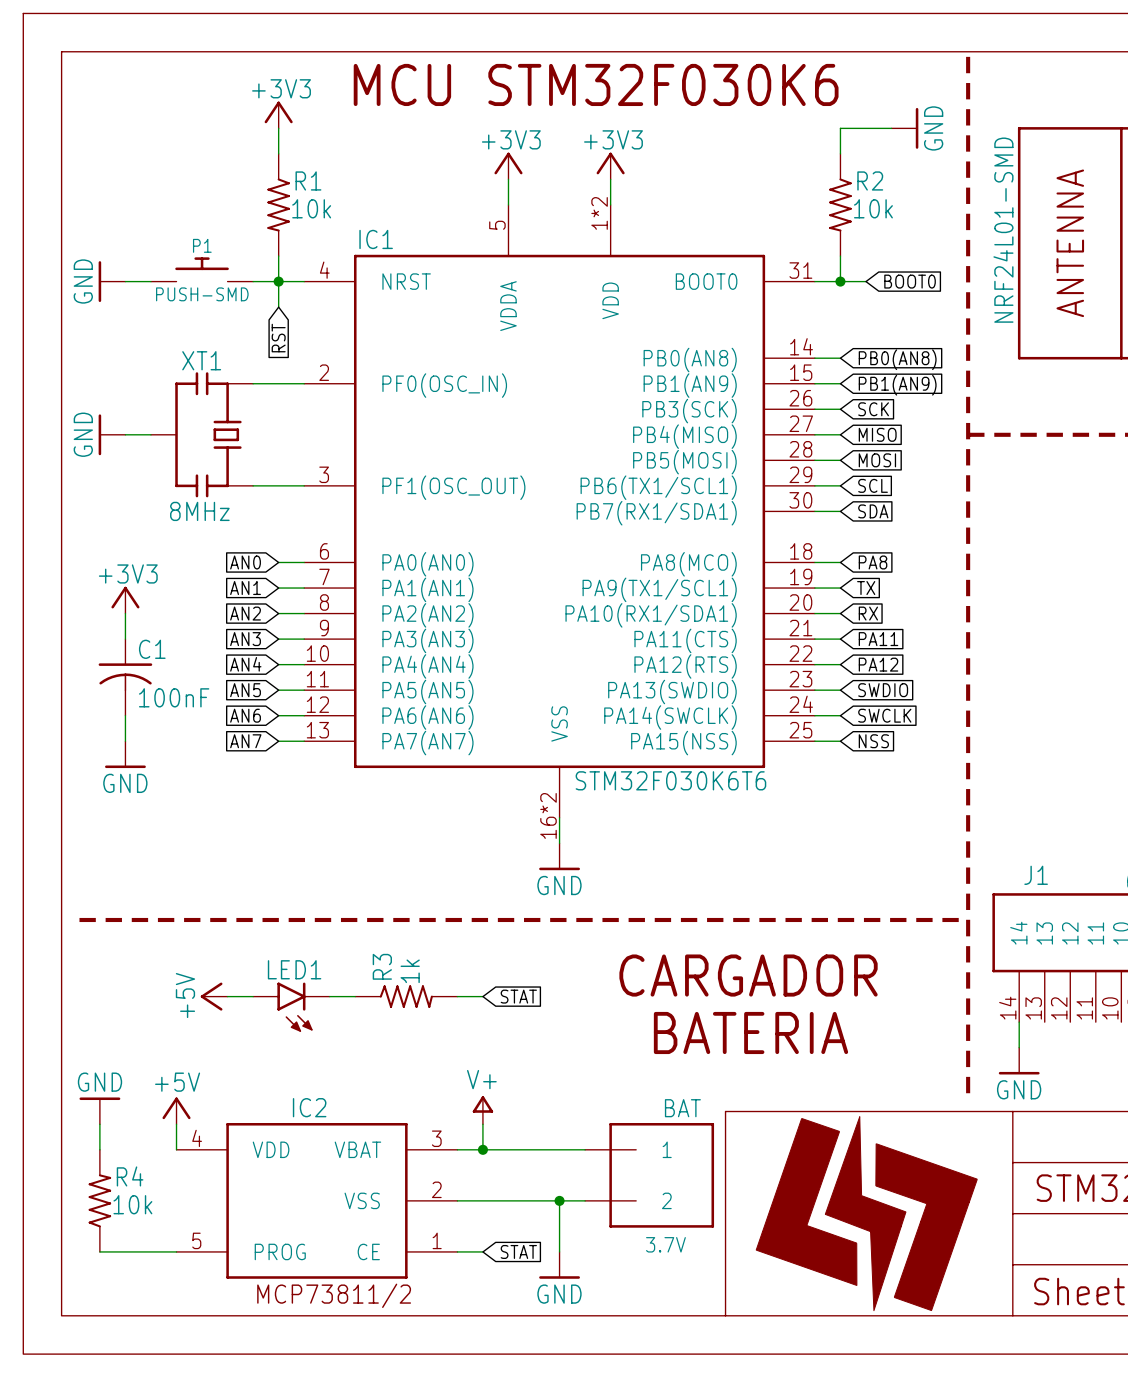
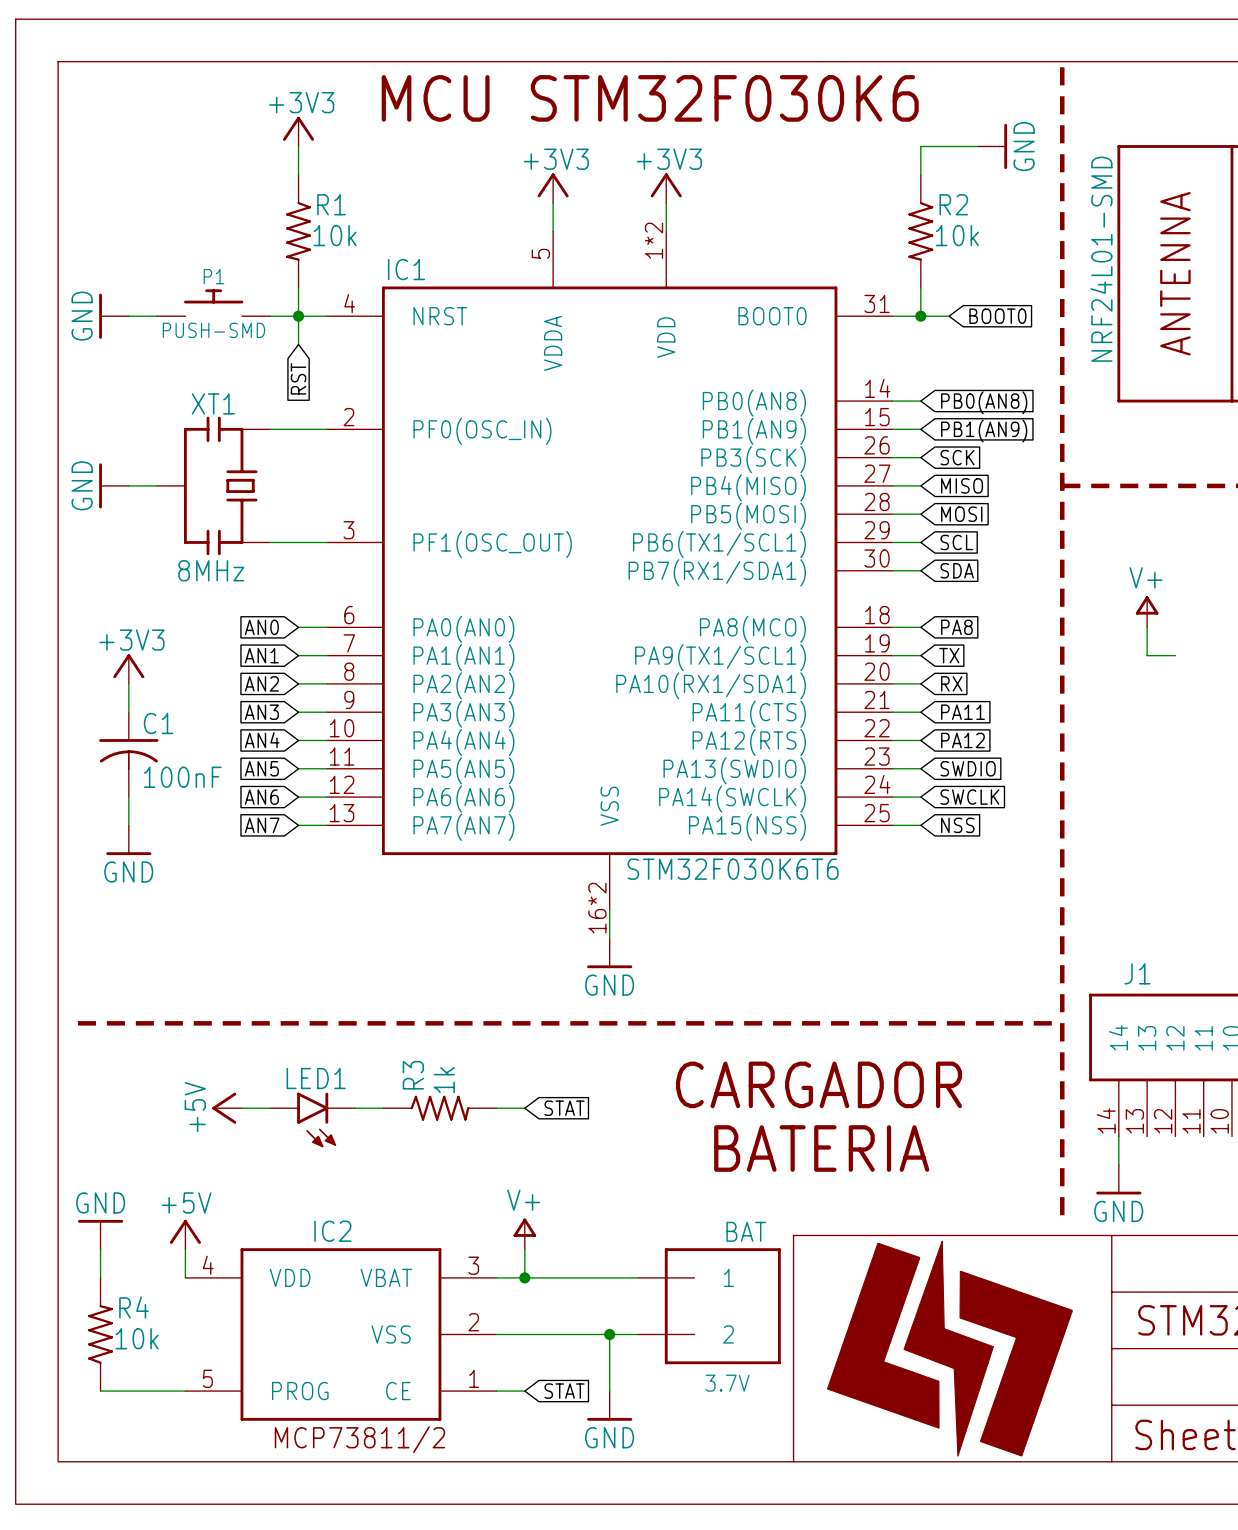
power symbol: none -> V+ (1147, 611)
wire: none -> (1147, 627) (1147, 655) (1175, 655)

